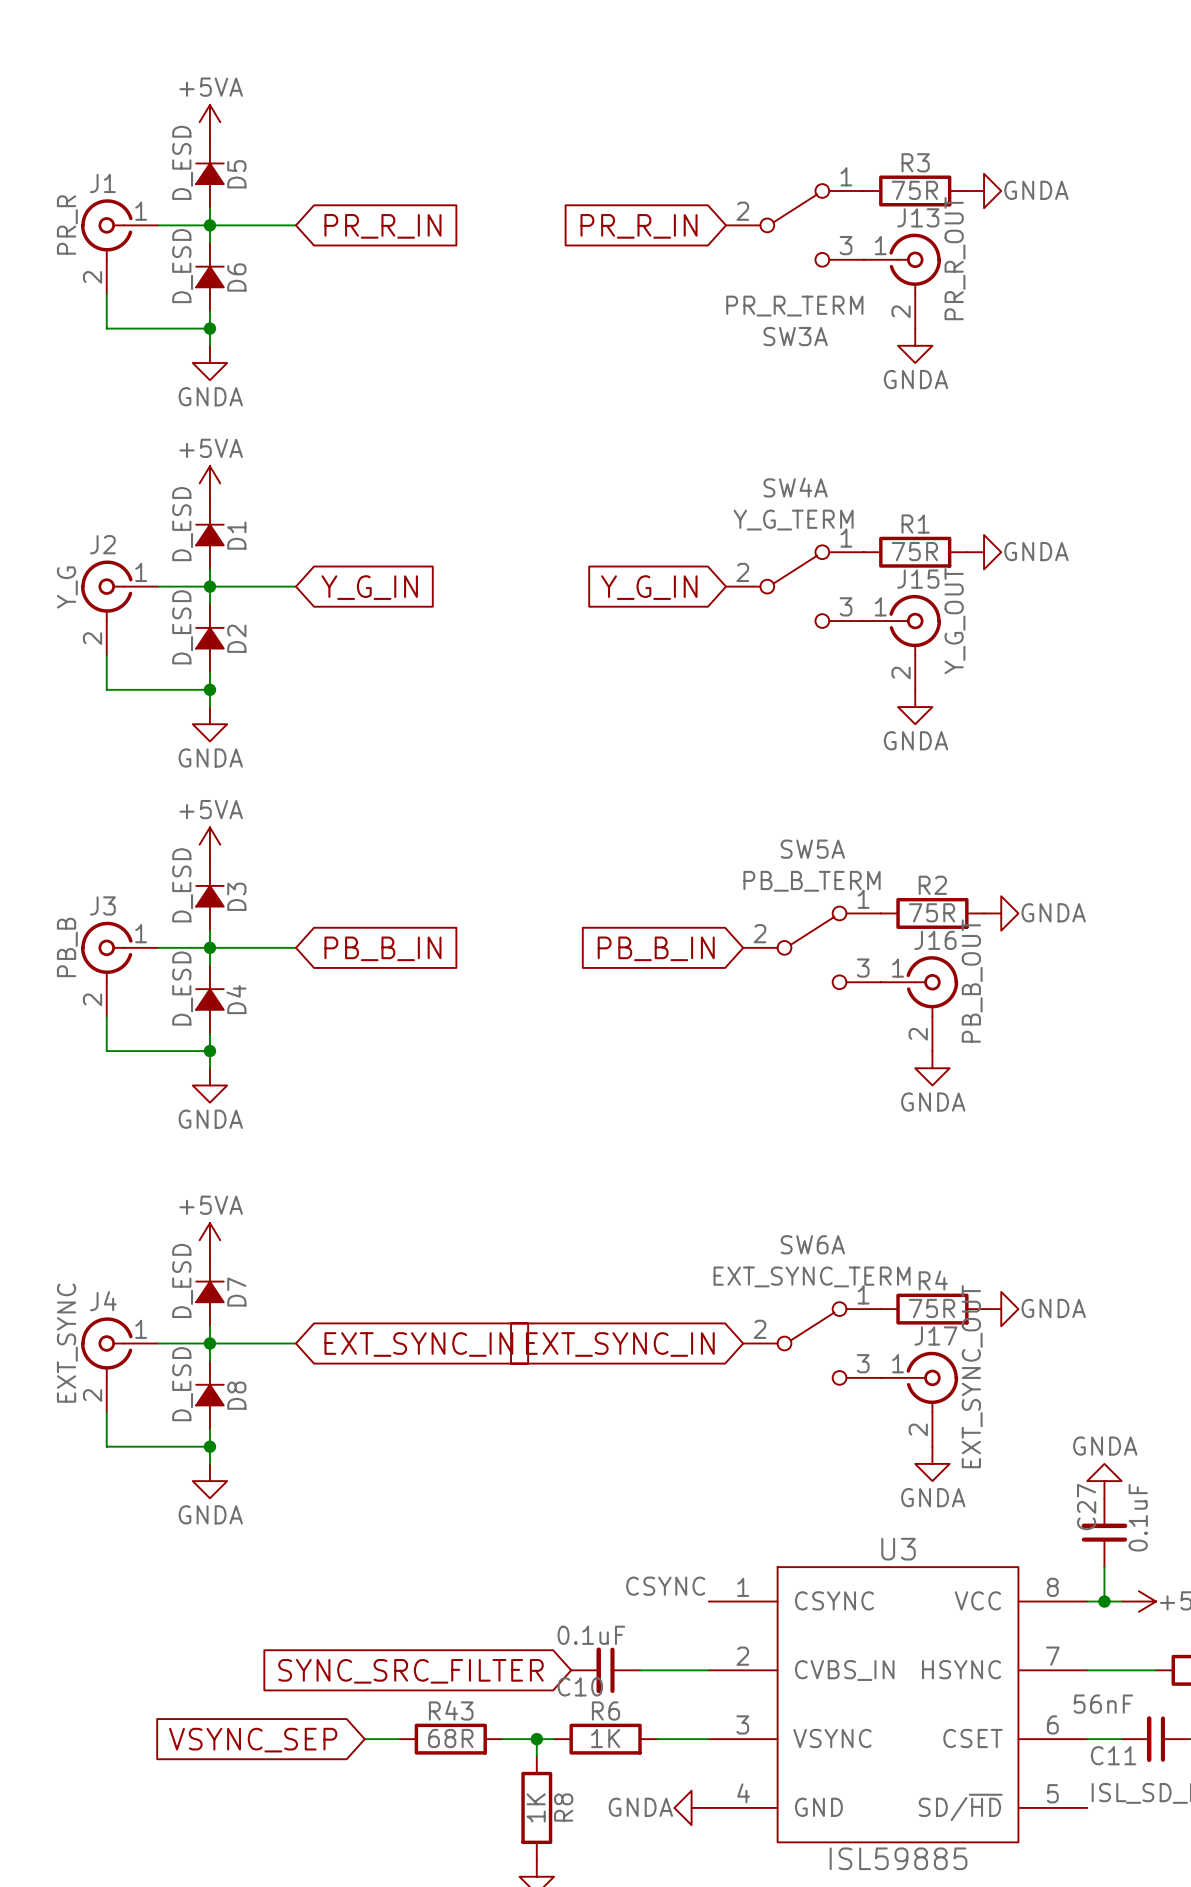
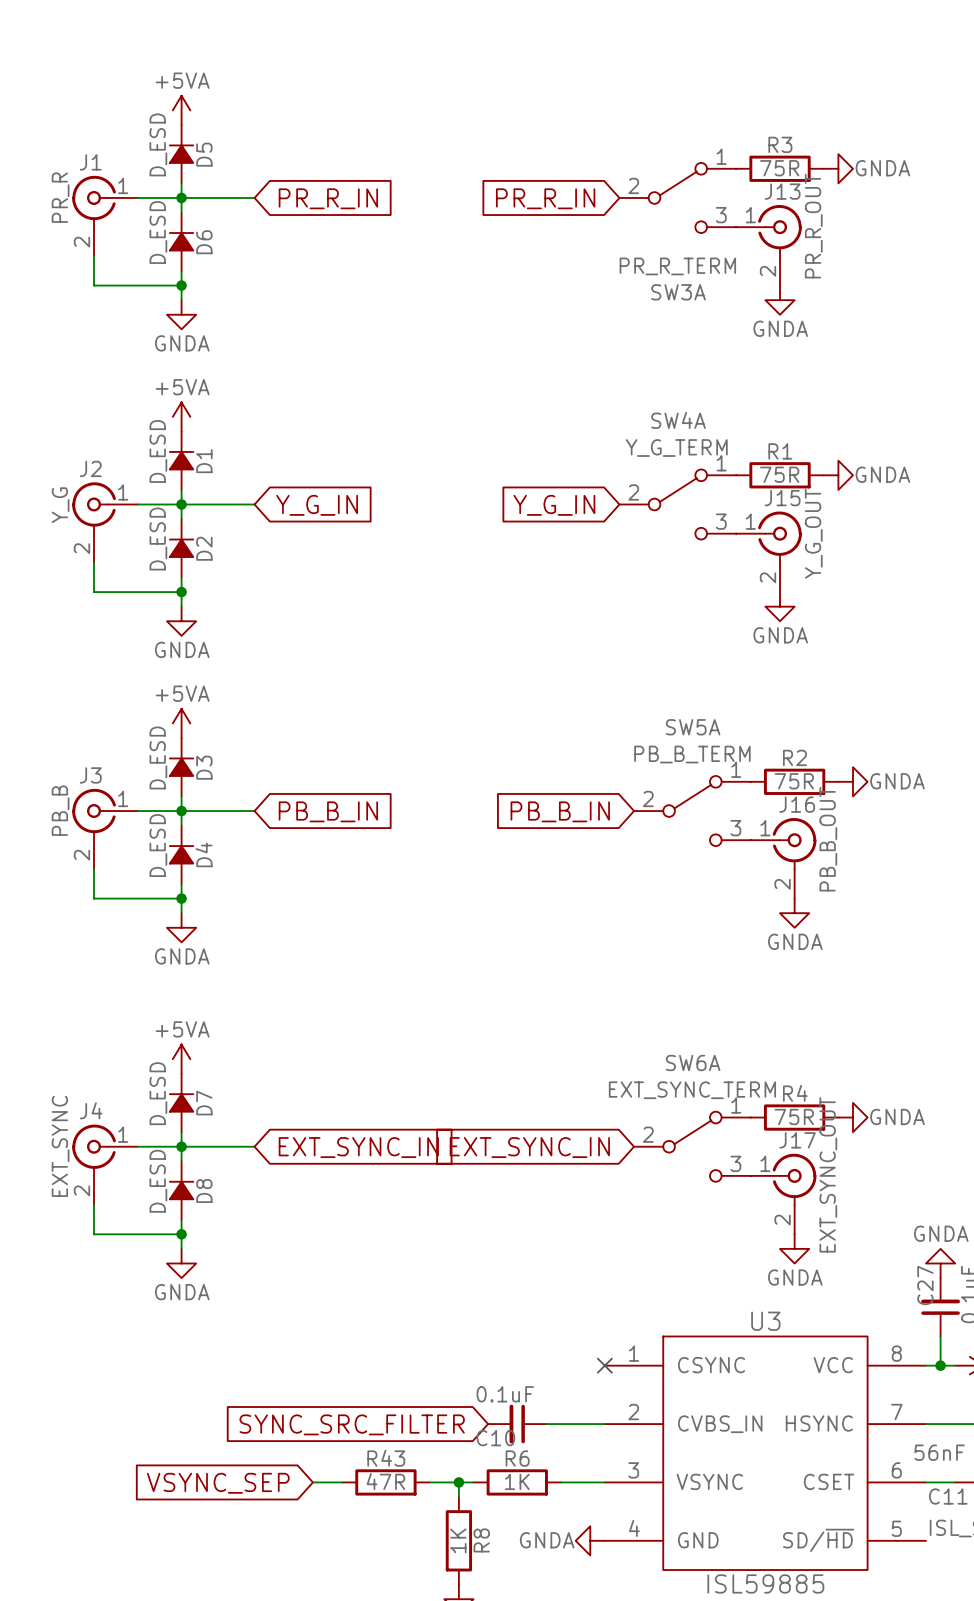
label: CSYNC (665, 1586) -> none
no-connect mark: none -> (604, 1365)
R43 value: 68R (450, 1738) -> 47R (385, 1481)

